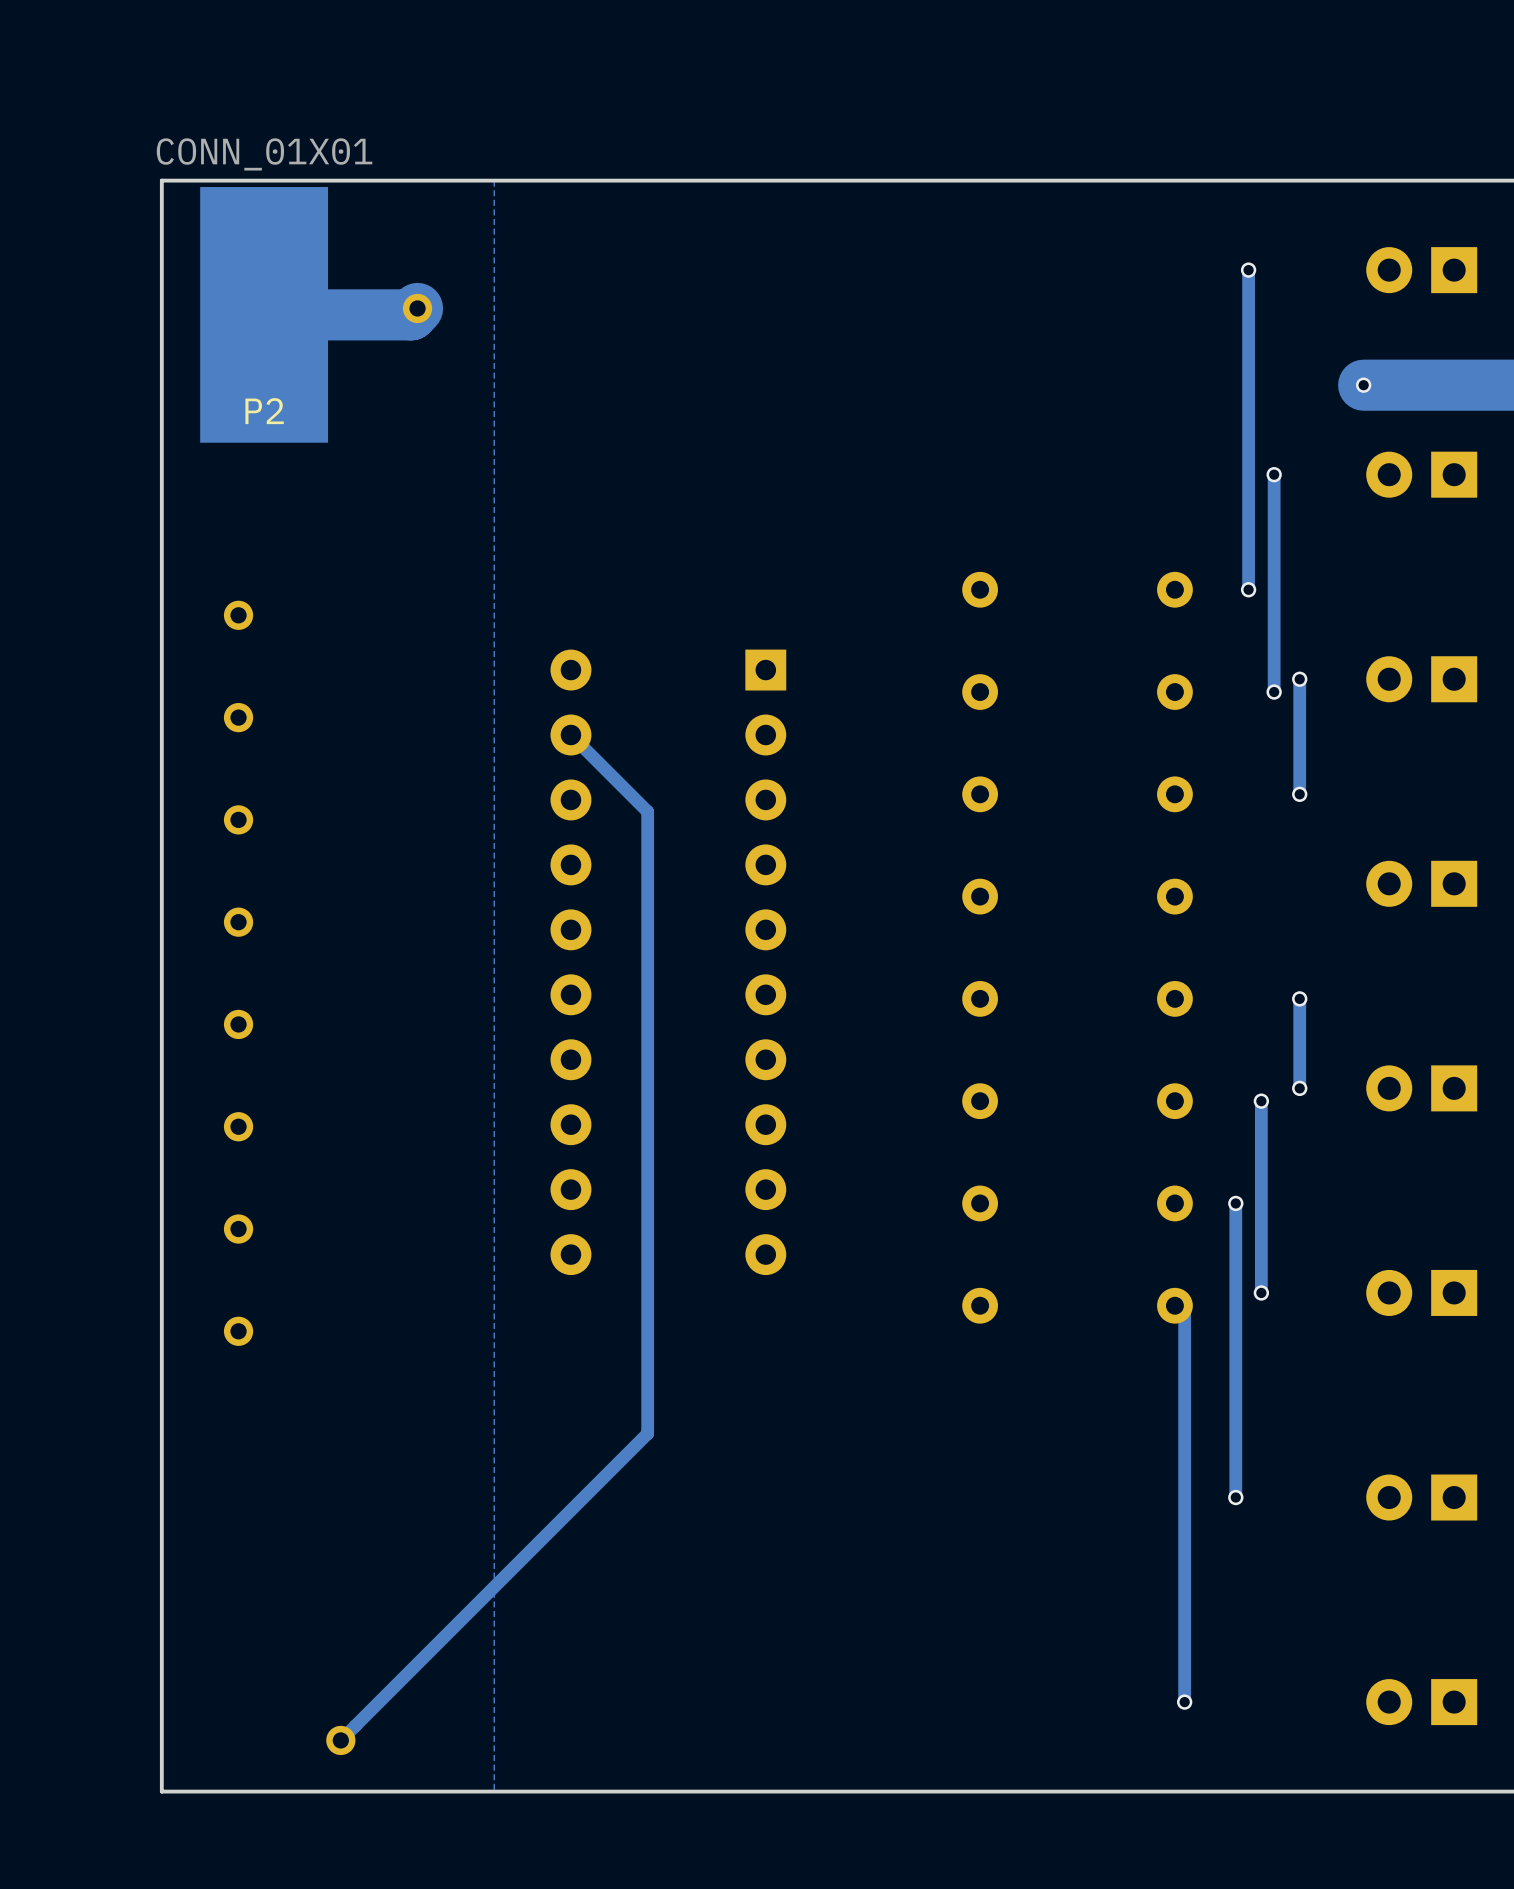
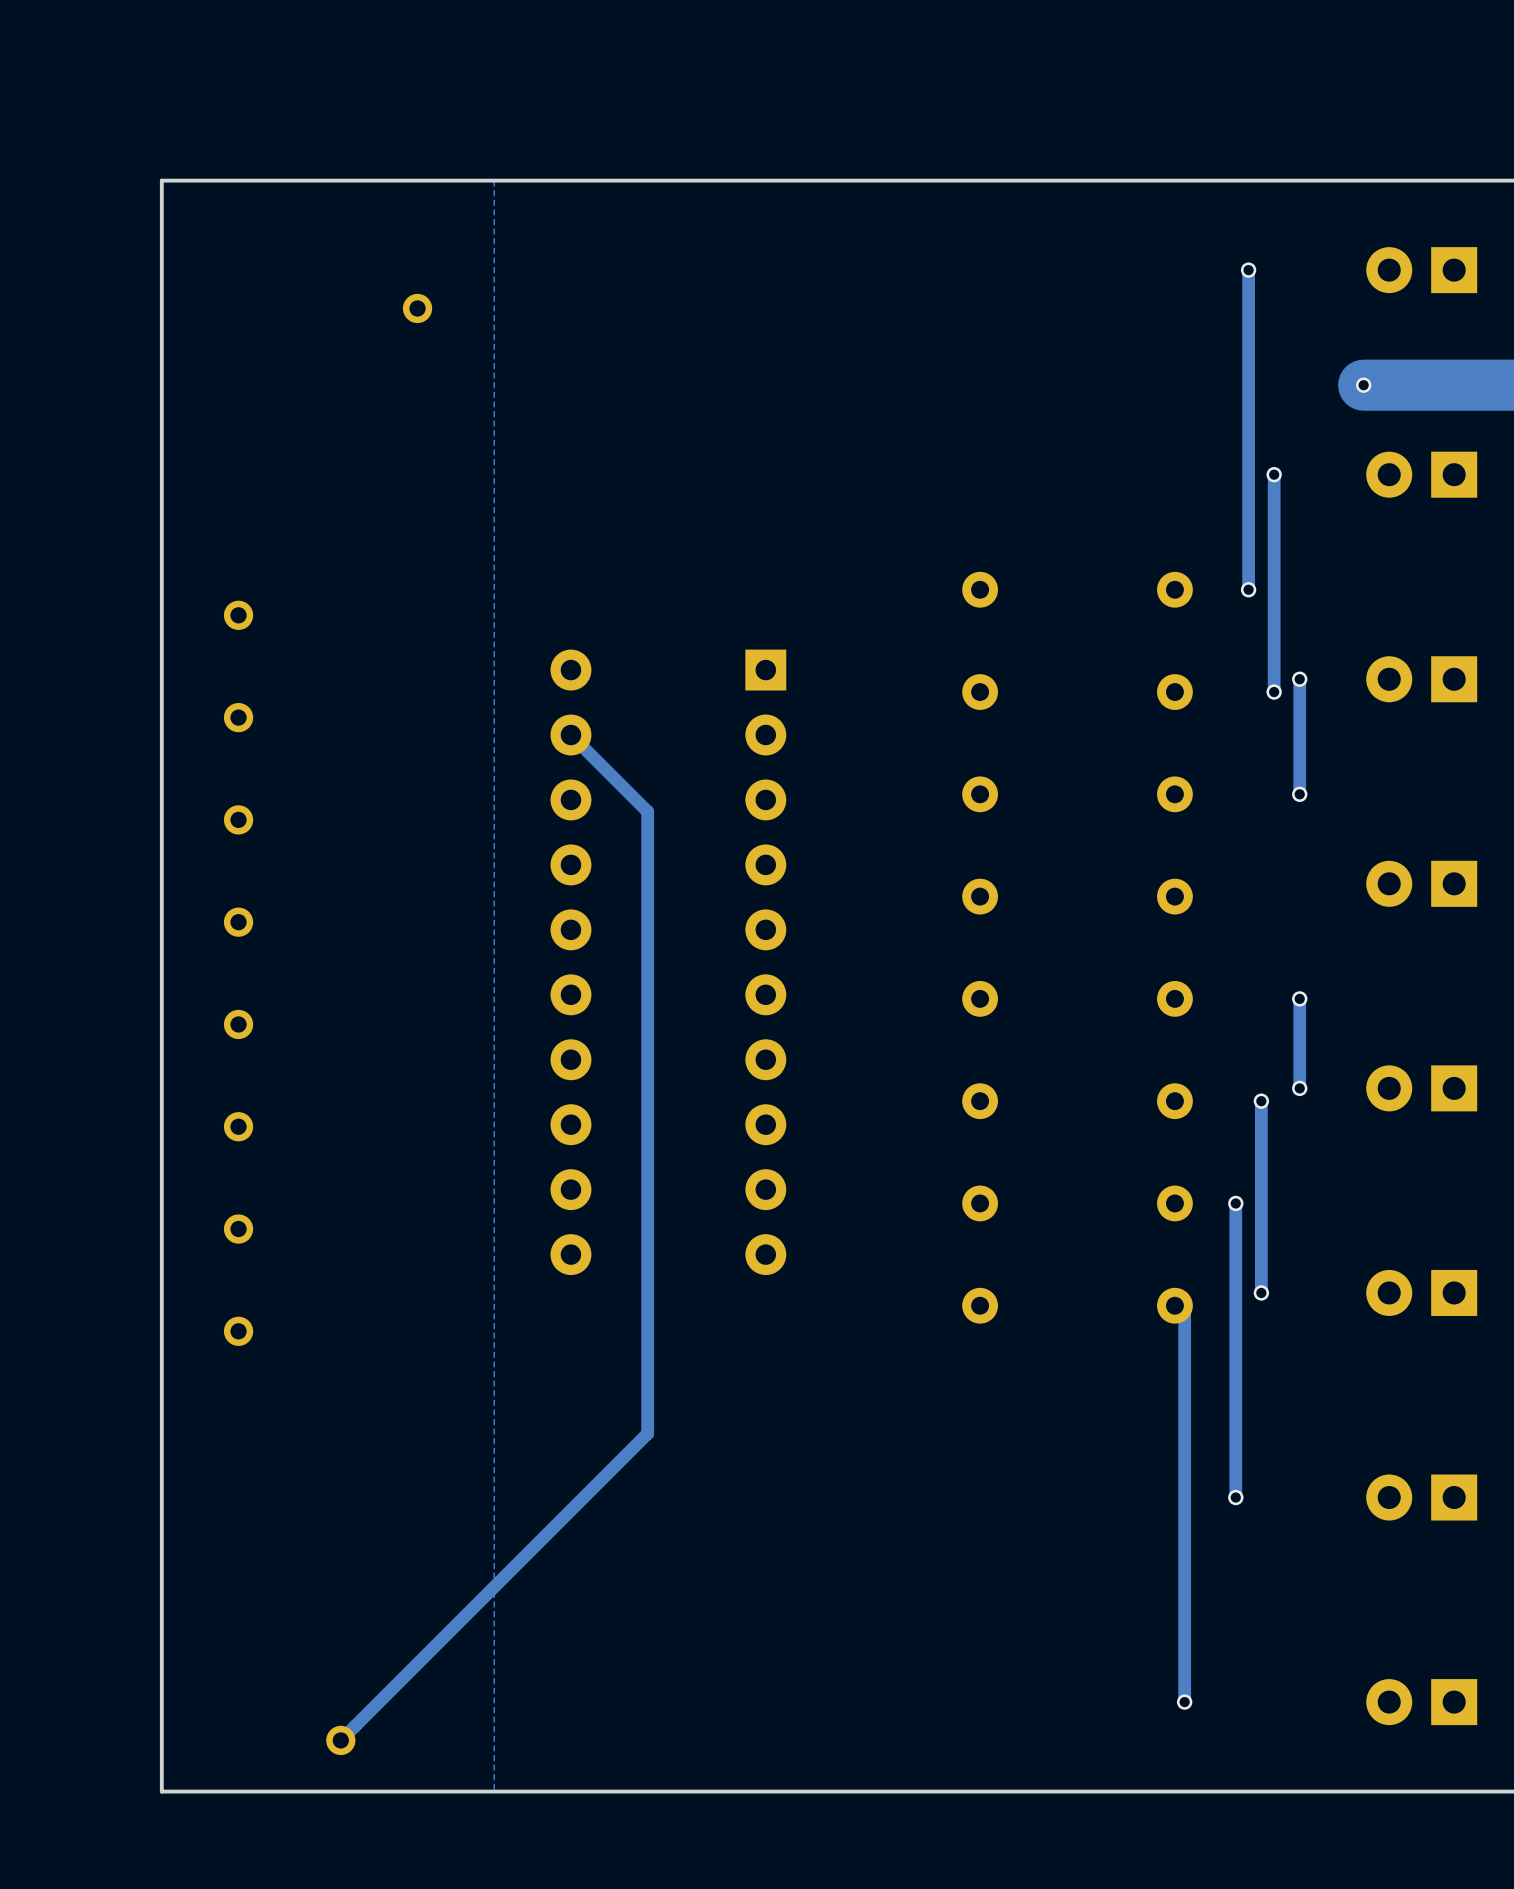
track: (417, 308) (411, 314) (264, 314) -> none
P2: CONN_01X01 (264, 314) -> none

